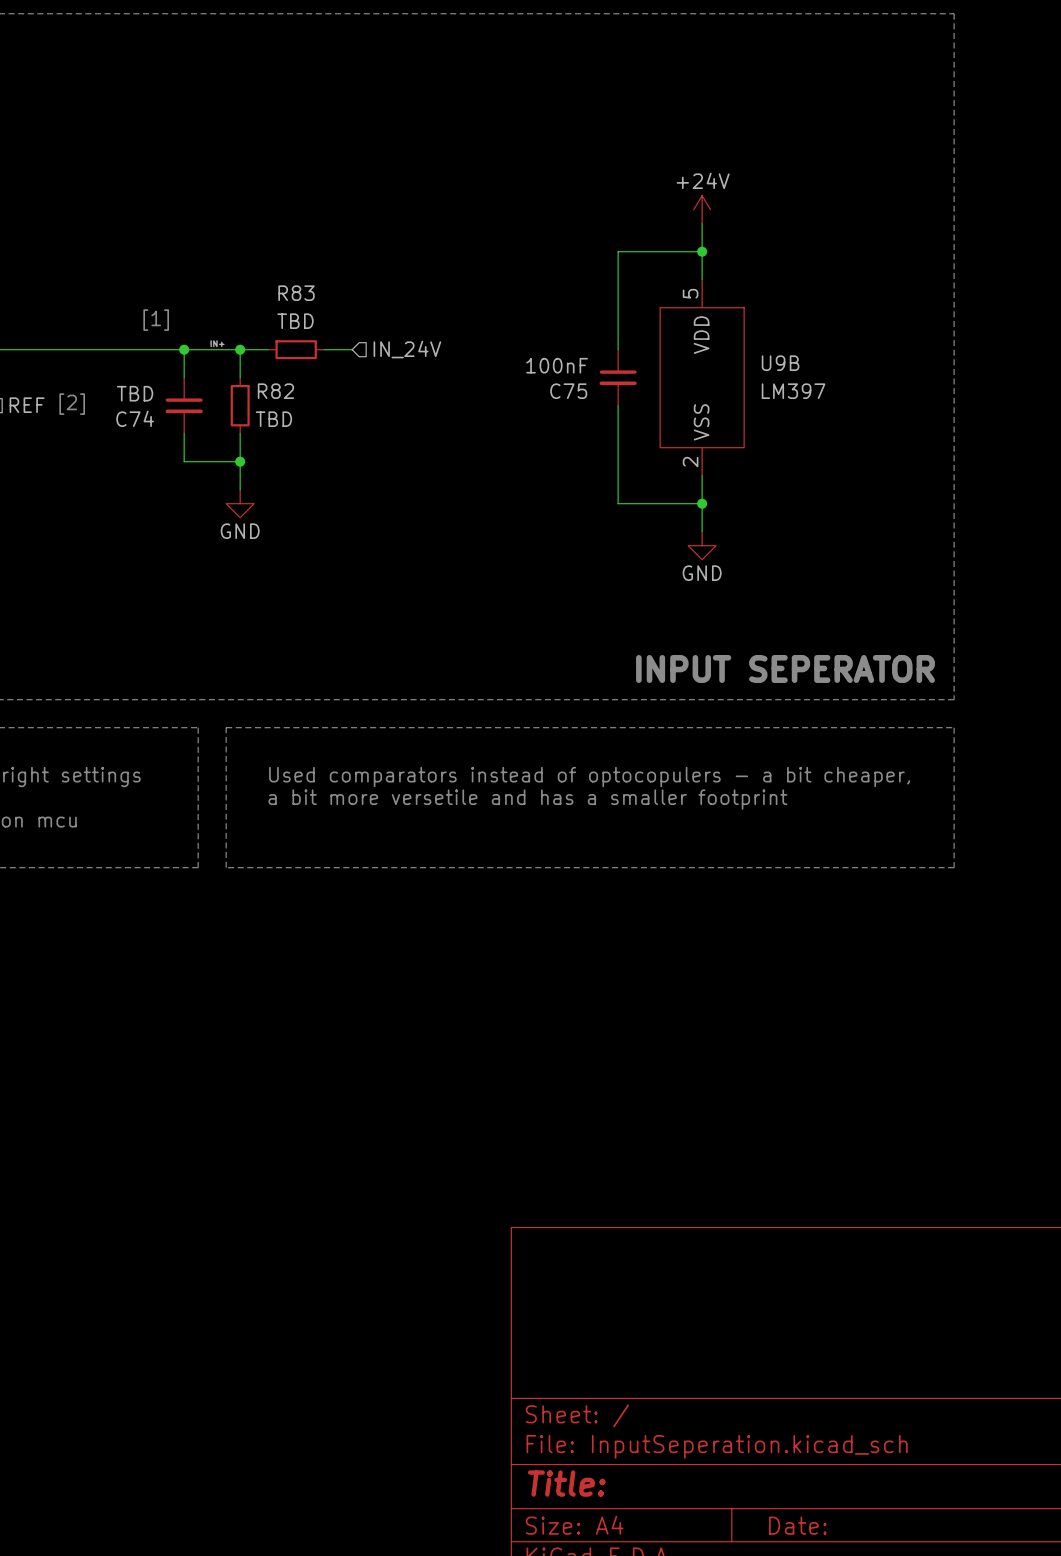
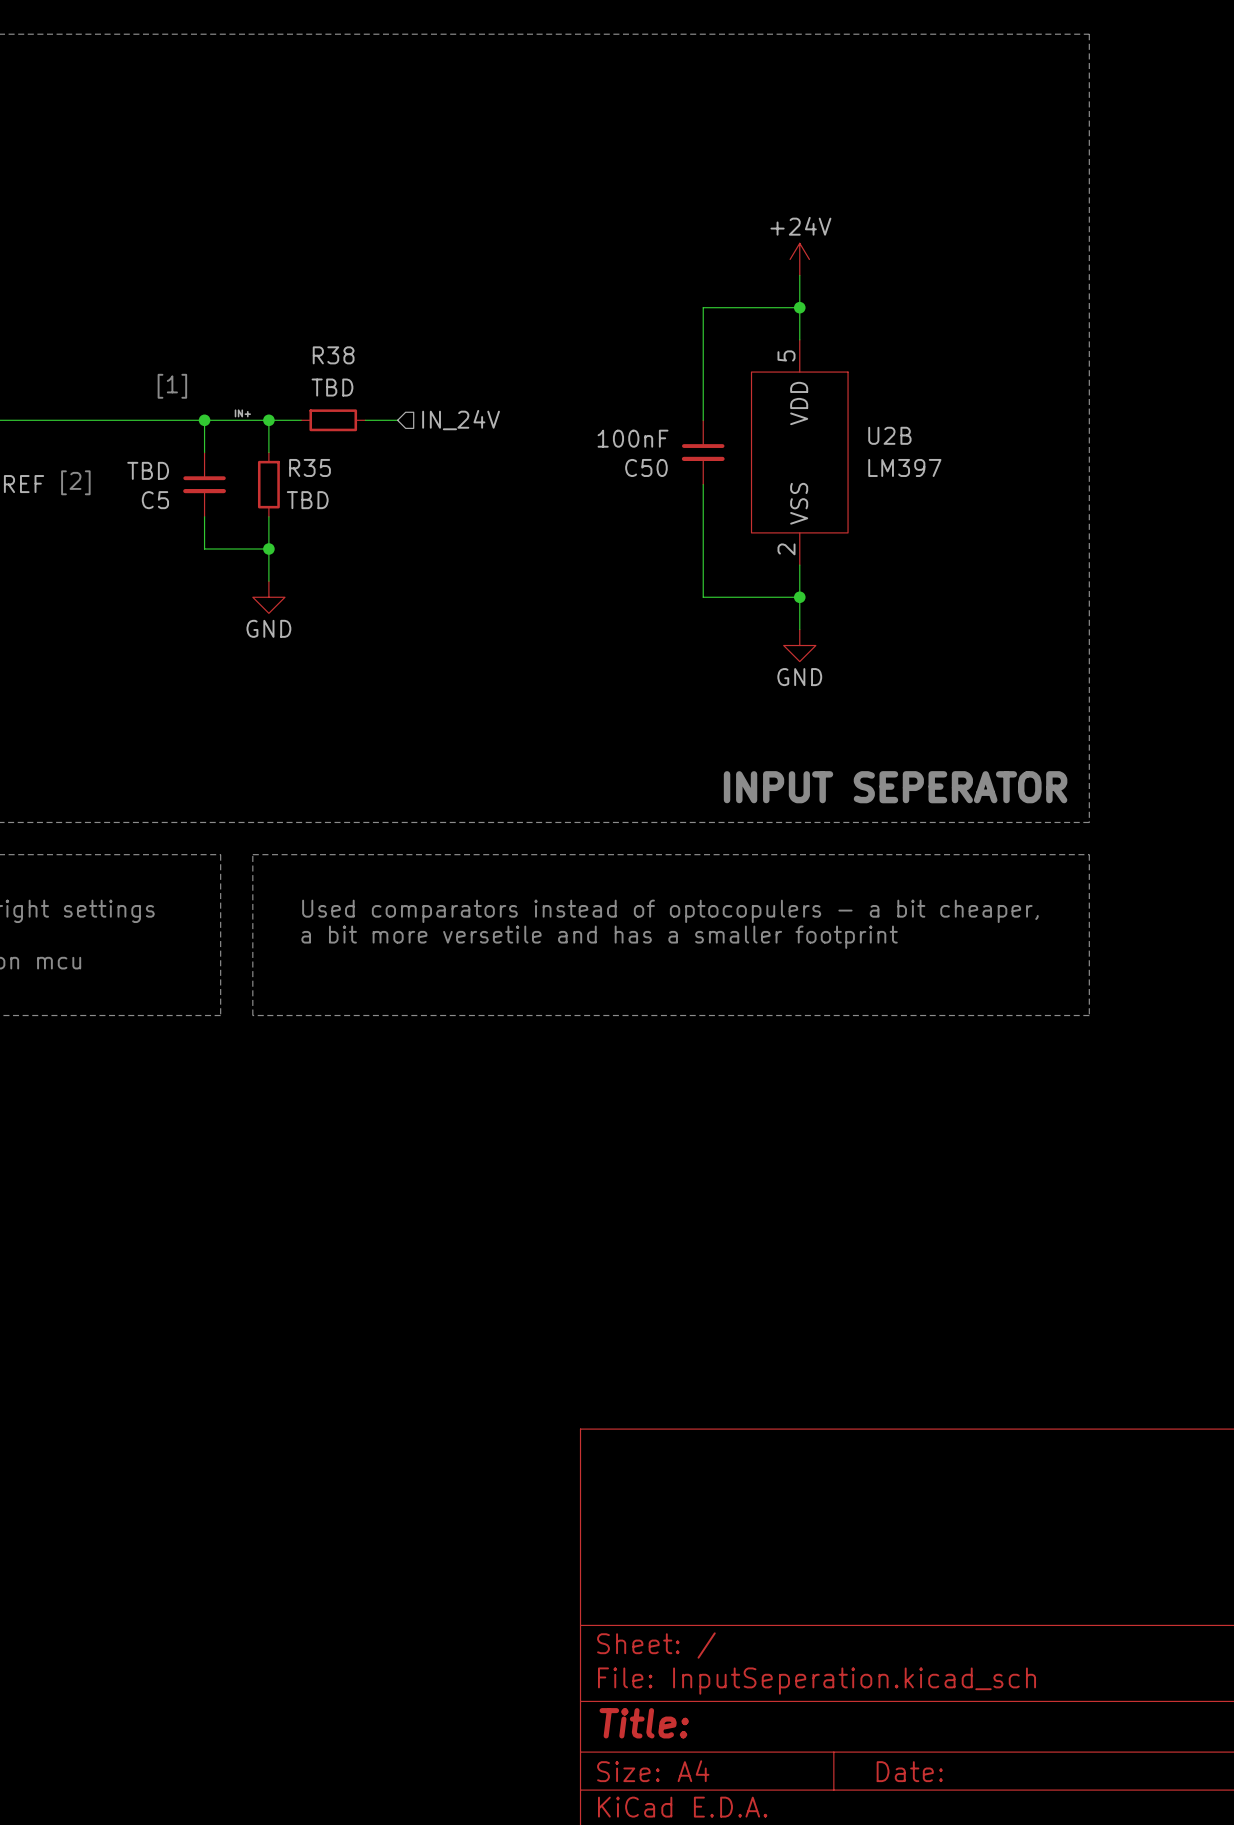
R83 name: R83 (296, 293) -> R38 (333, 355)
U9B name: U9B (780, 363) -> U2B (889, 435)
R82 name: R82 (275, 391) -> R35 (310, 467)
C75 name: C75 (568, 391) -> C50 (646, 467)
C74 name: C74 (135, 418) -> C5 (155, 500)

